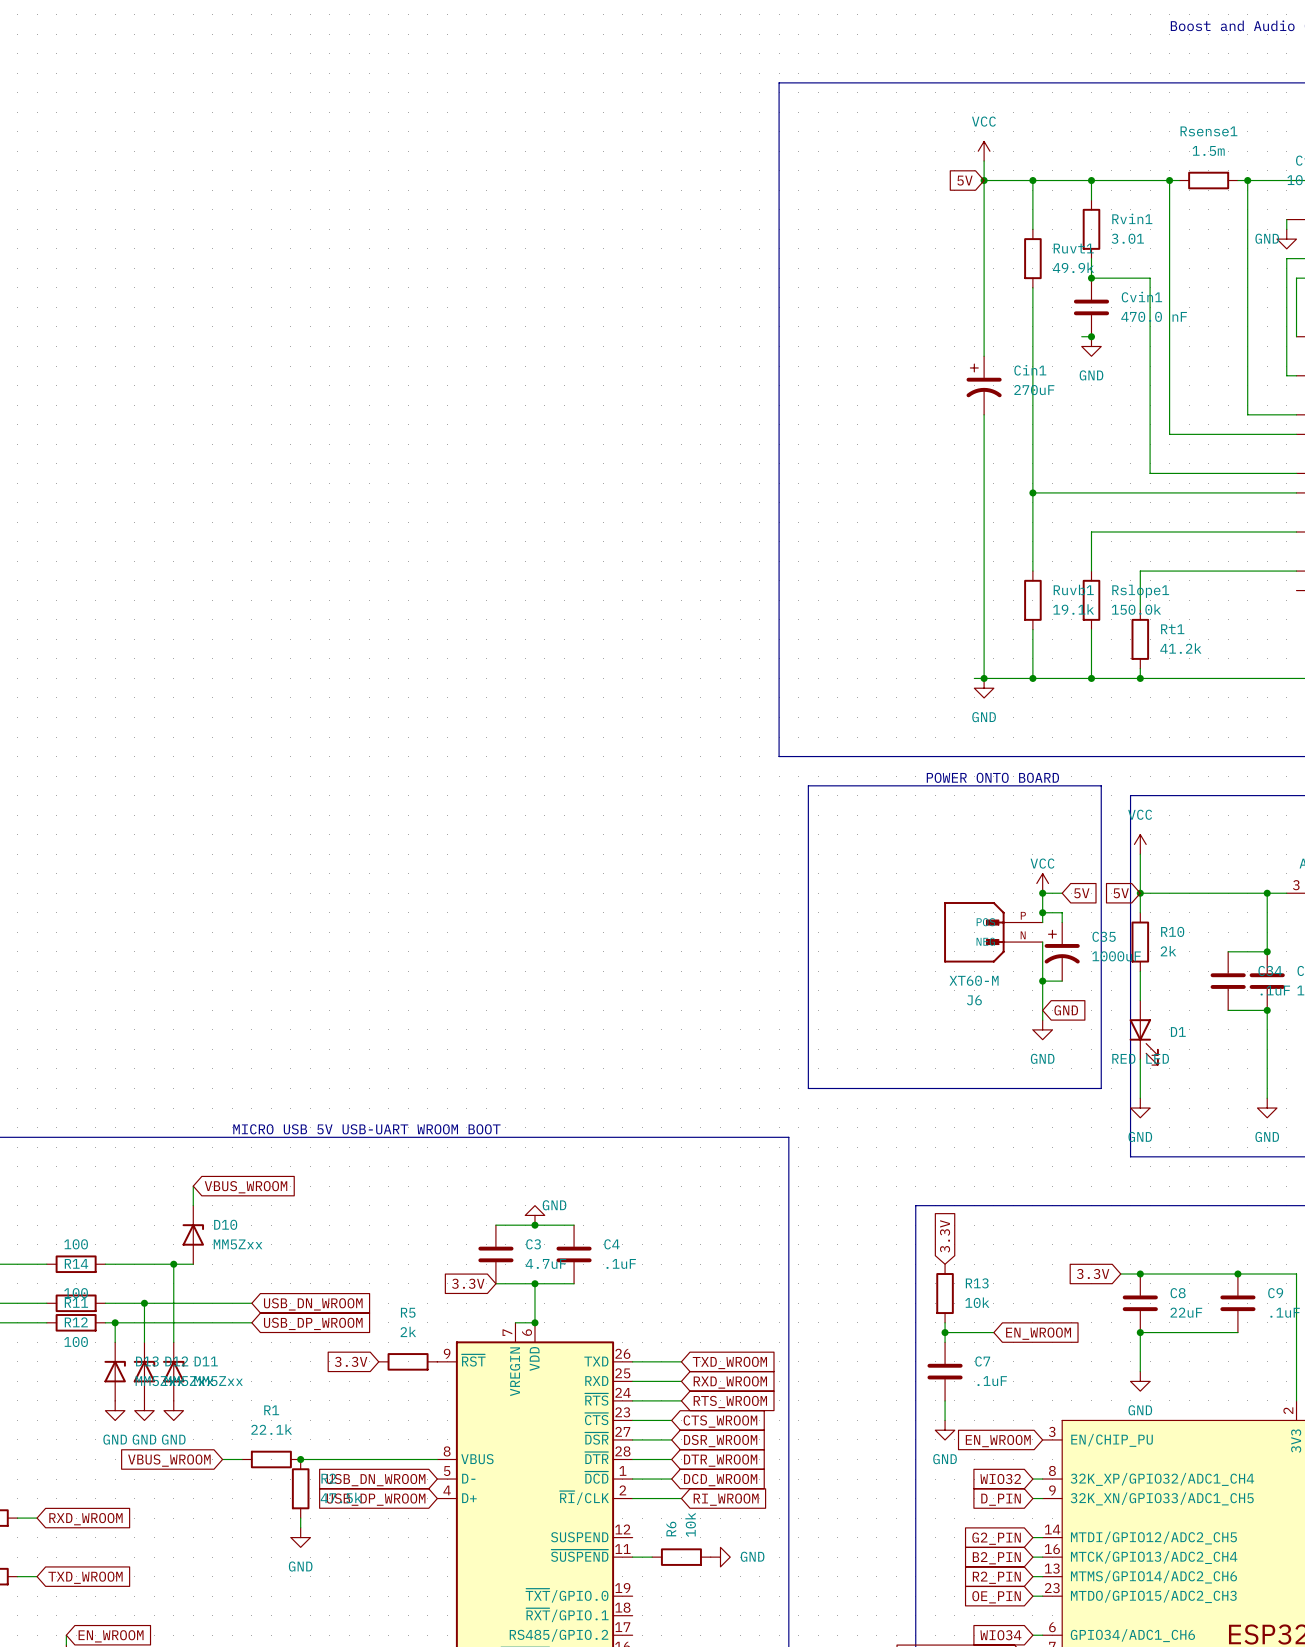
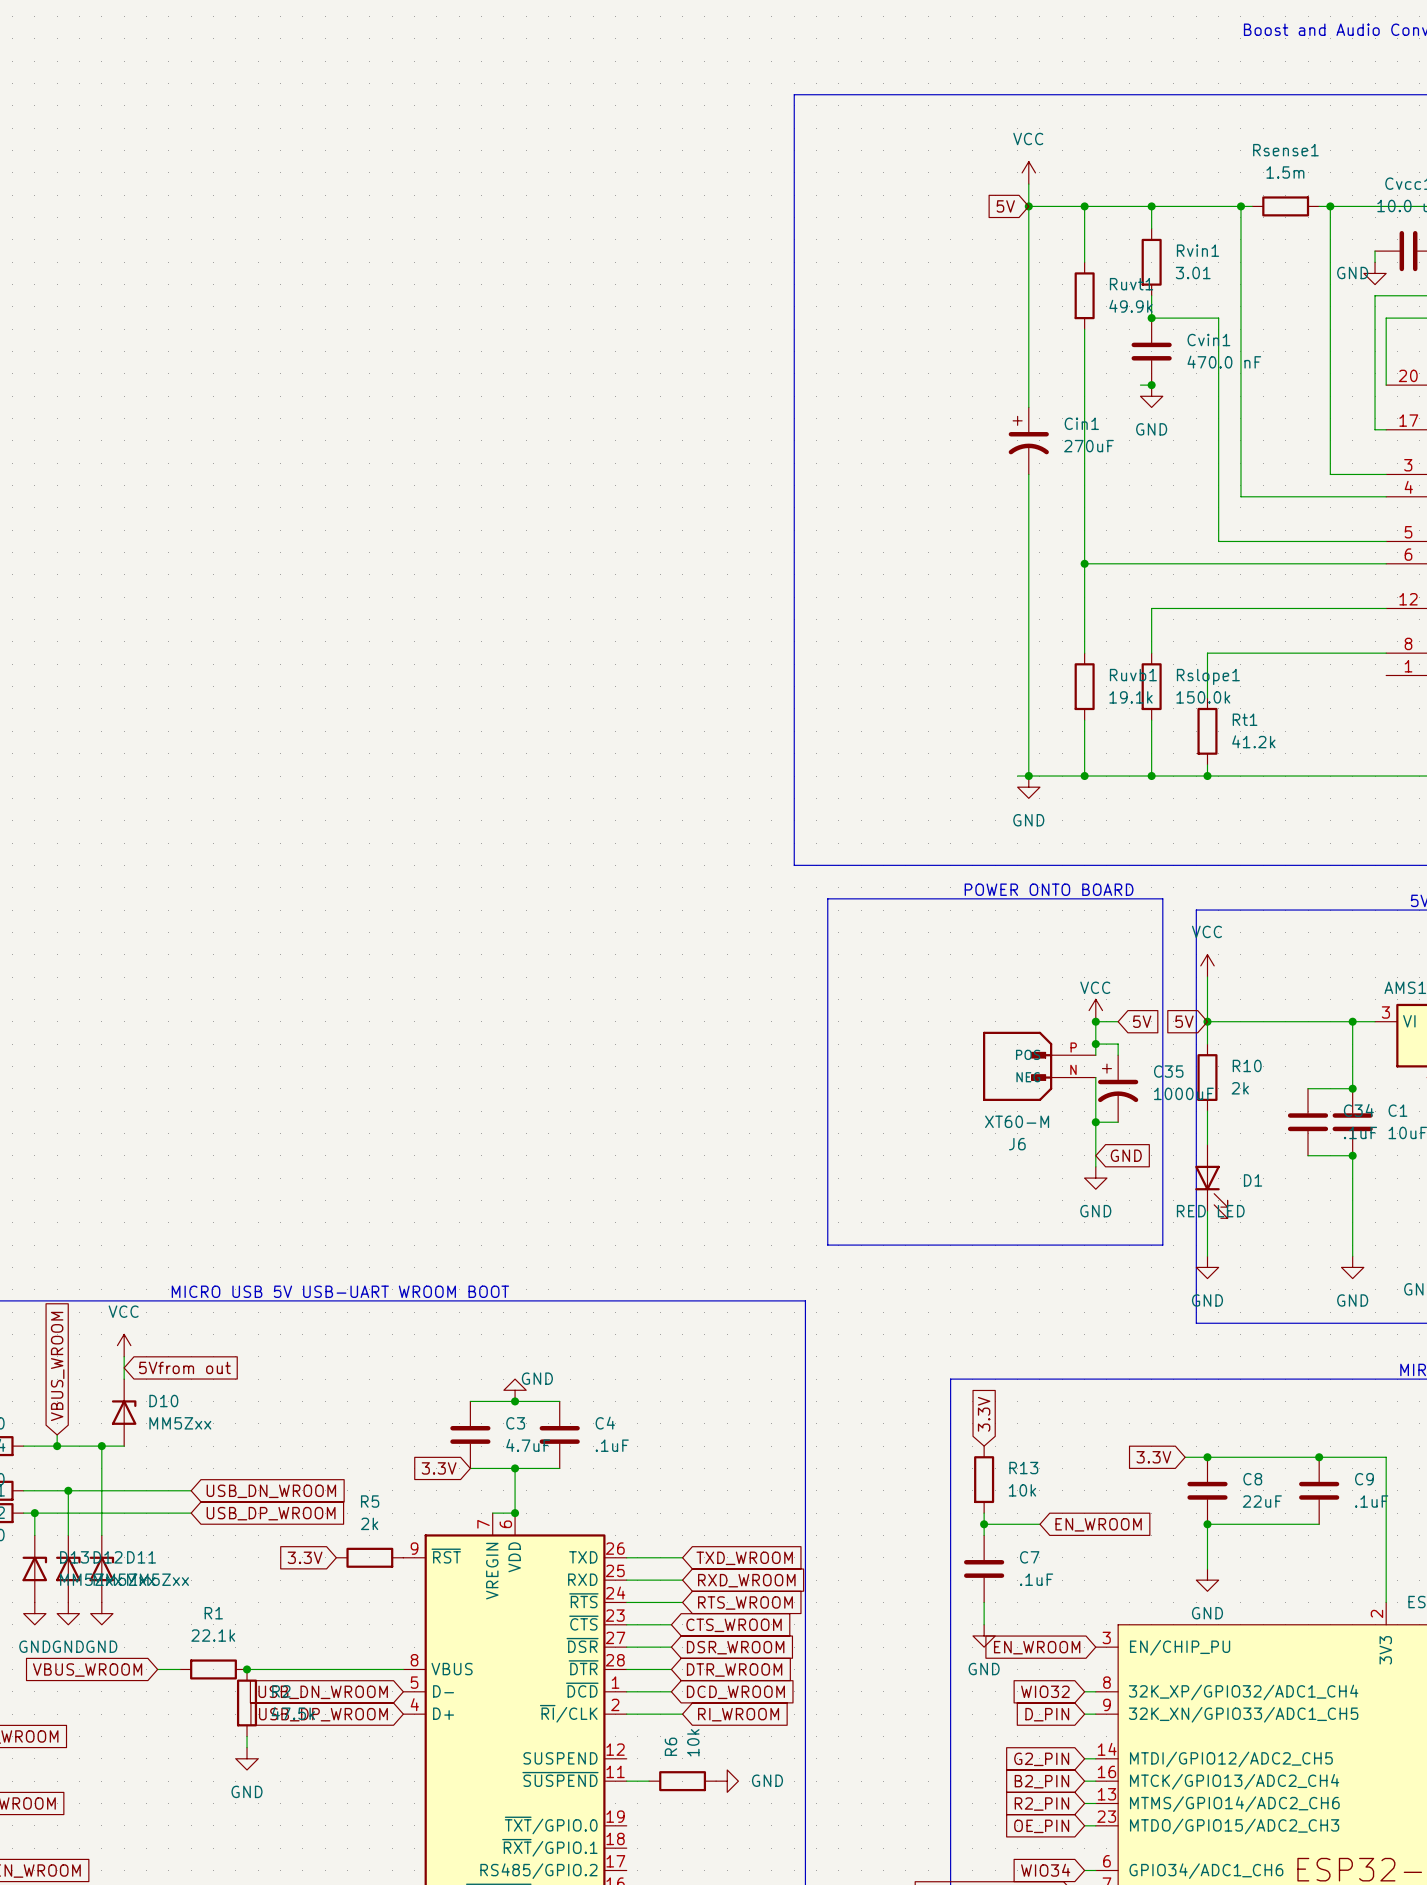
power symbol: none -> VCC (124, 1345)
global label rotation: 0° (246, 1187) -> 90° counterclockwise (57, 1366)
global label: none -> 5Vfrom out (184, 1367)
wire: none -> (57, 1434) (57, 1446)
junction: none -> (57, 1446)

